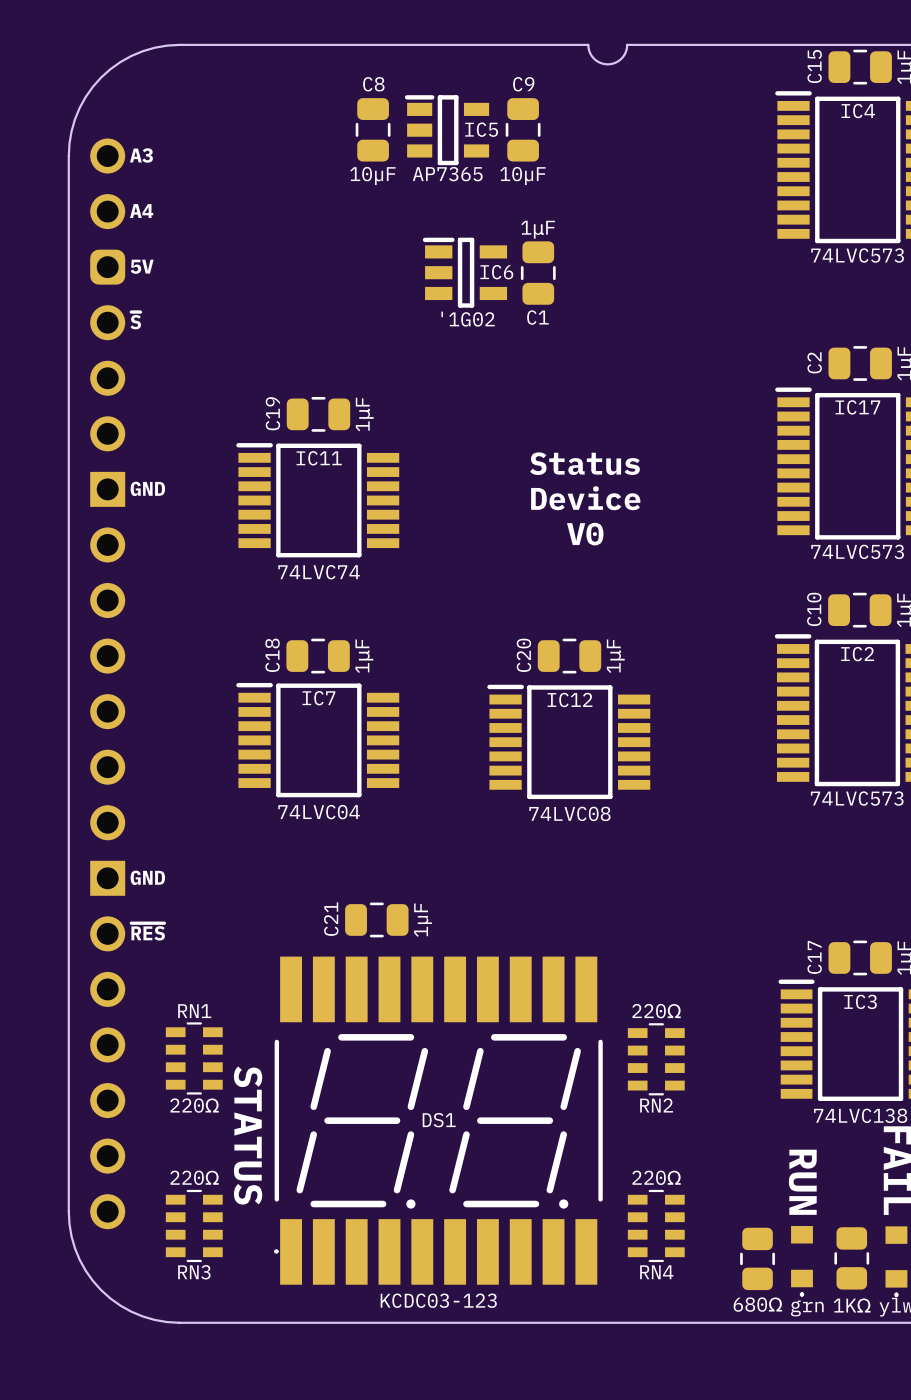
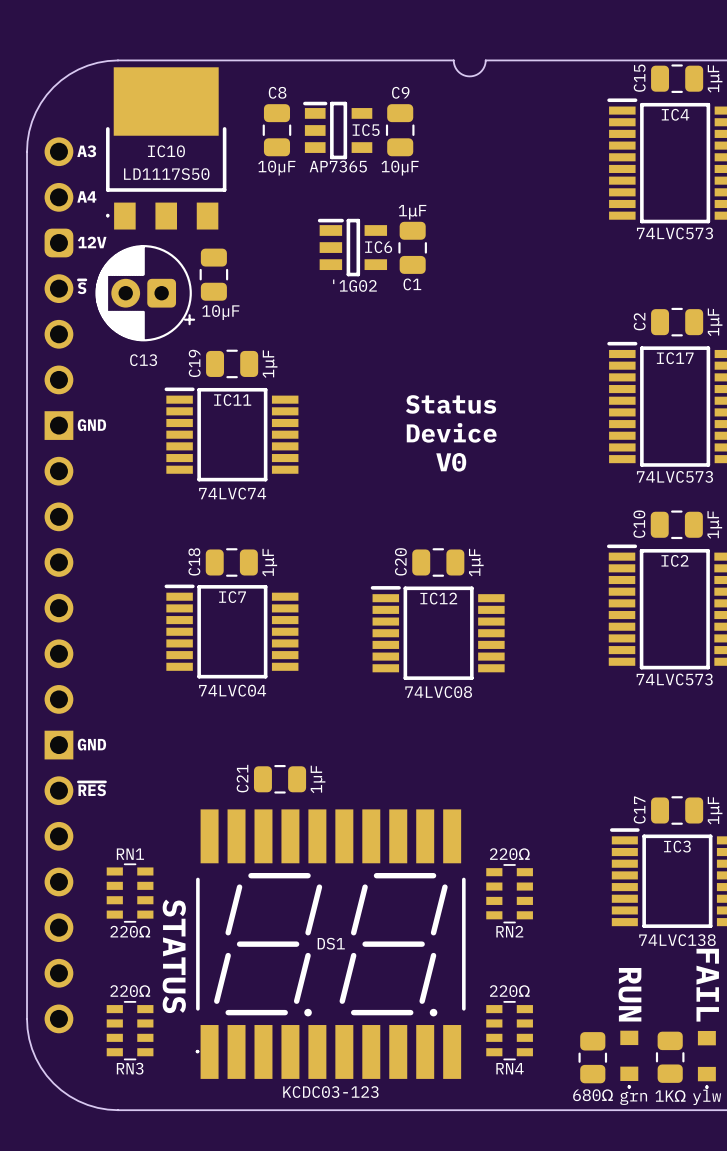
IC10: none -> (166, 148)
text: 5V (142, 266) -> 12V (92, 242)
part: none -> 10µF (213, 274)
C13: none -> (145, 293)

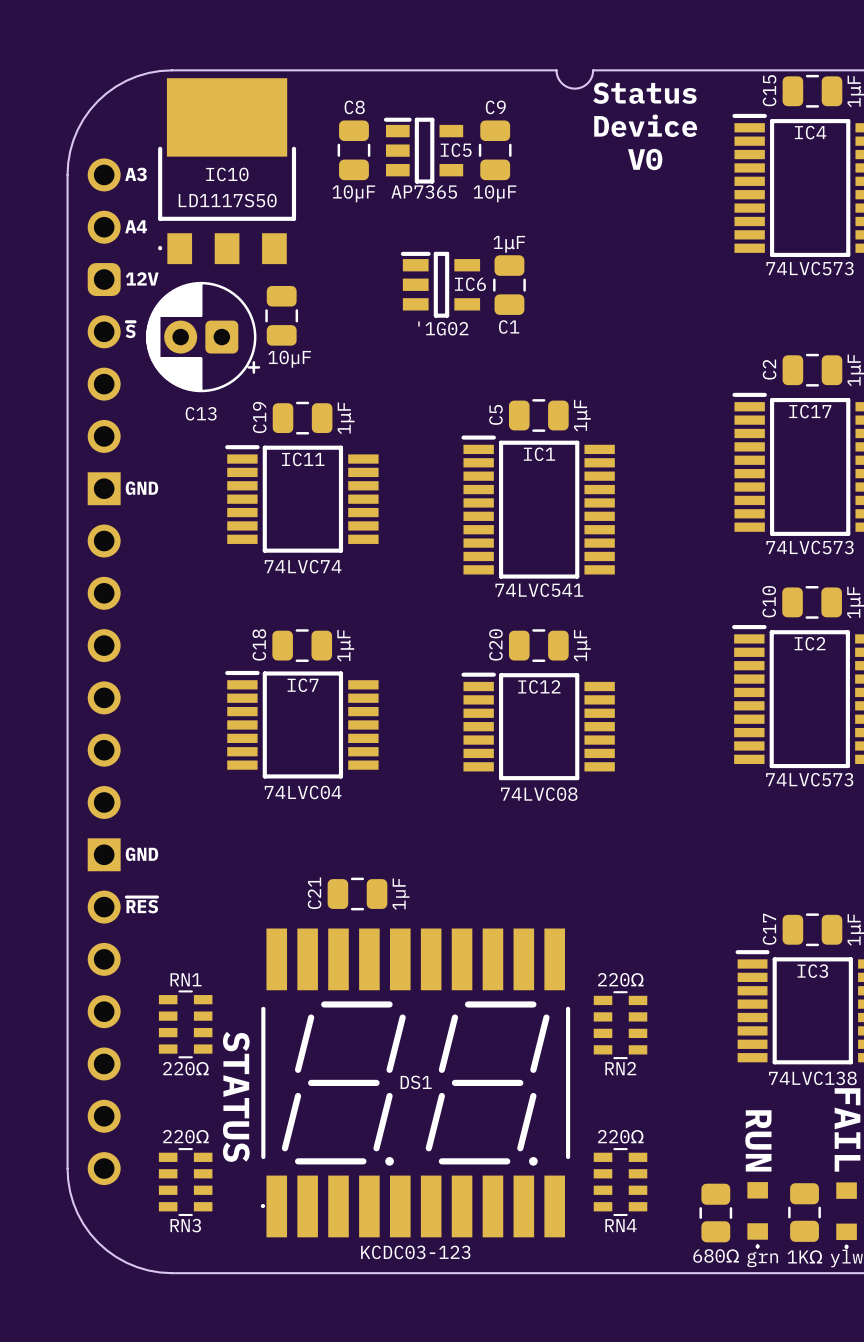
C5: none -> 1μF (538, 415)
text position: Status (451, 404) -> Status (644, 93)
text position: Device (451, 432) -> Device (645, 125)
IC1: none -> (538, 507)
text position: V0 (451, 462) -> V0 (645, 159)

